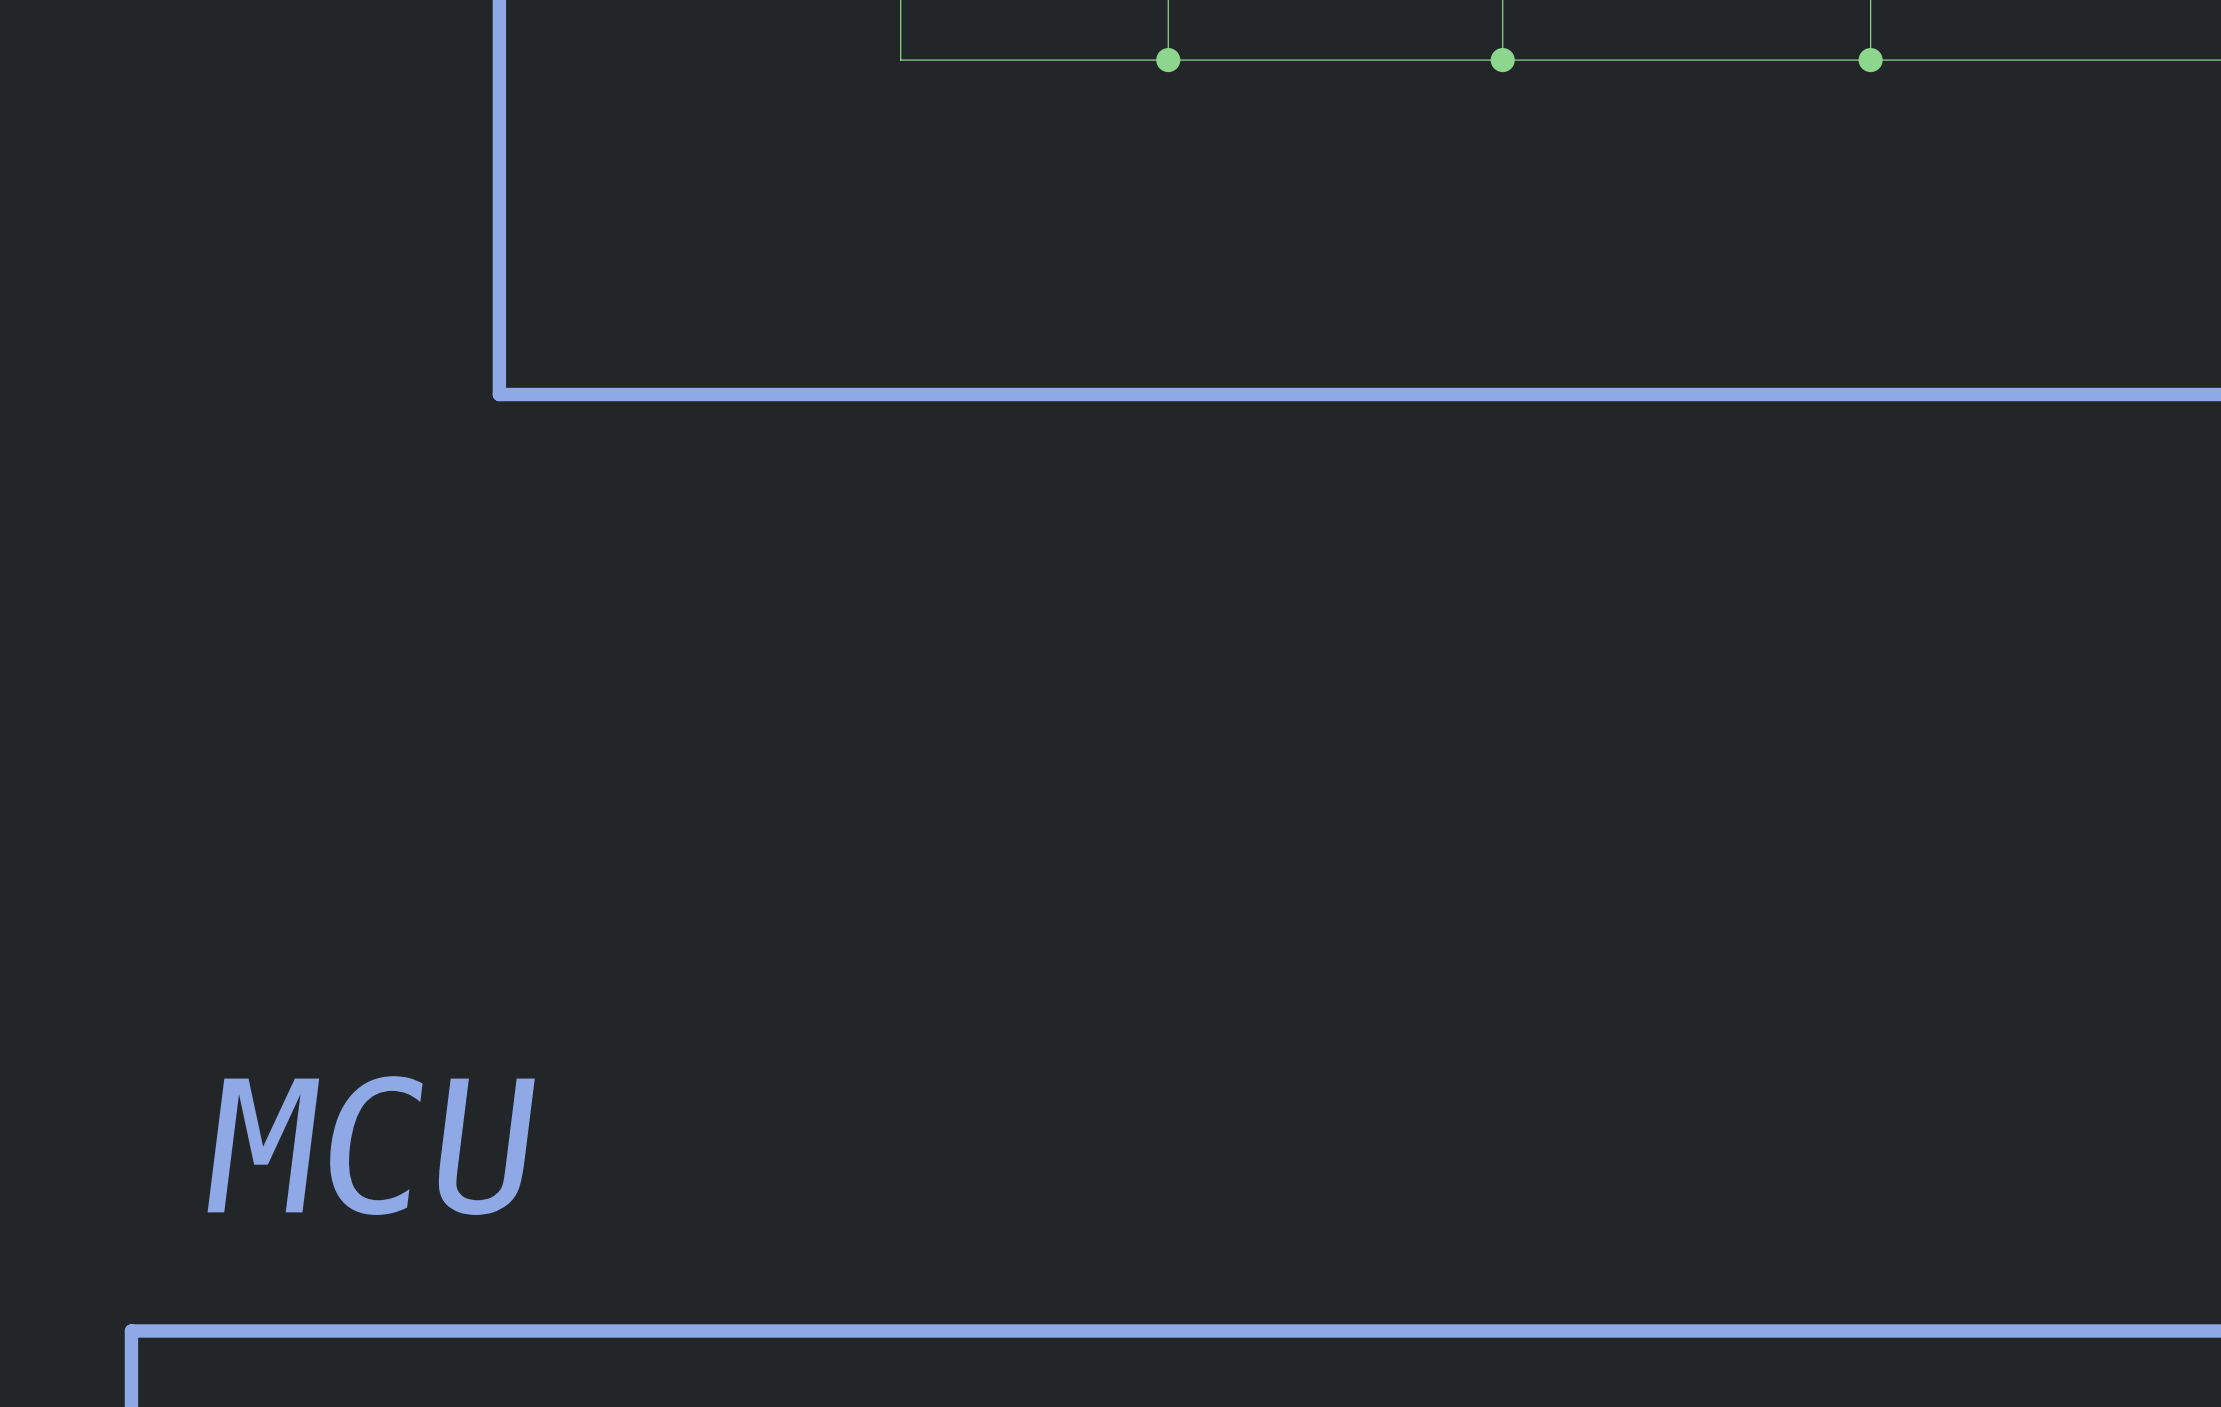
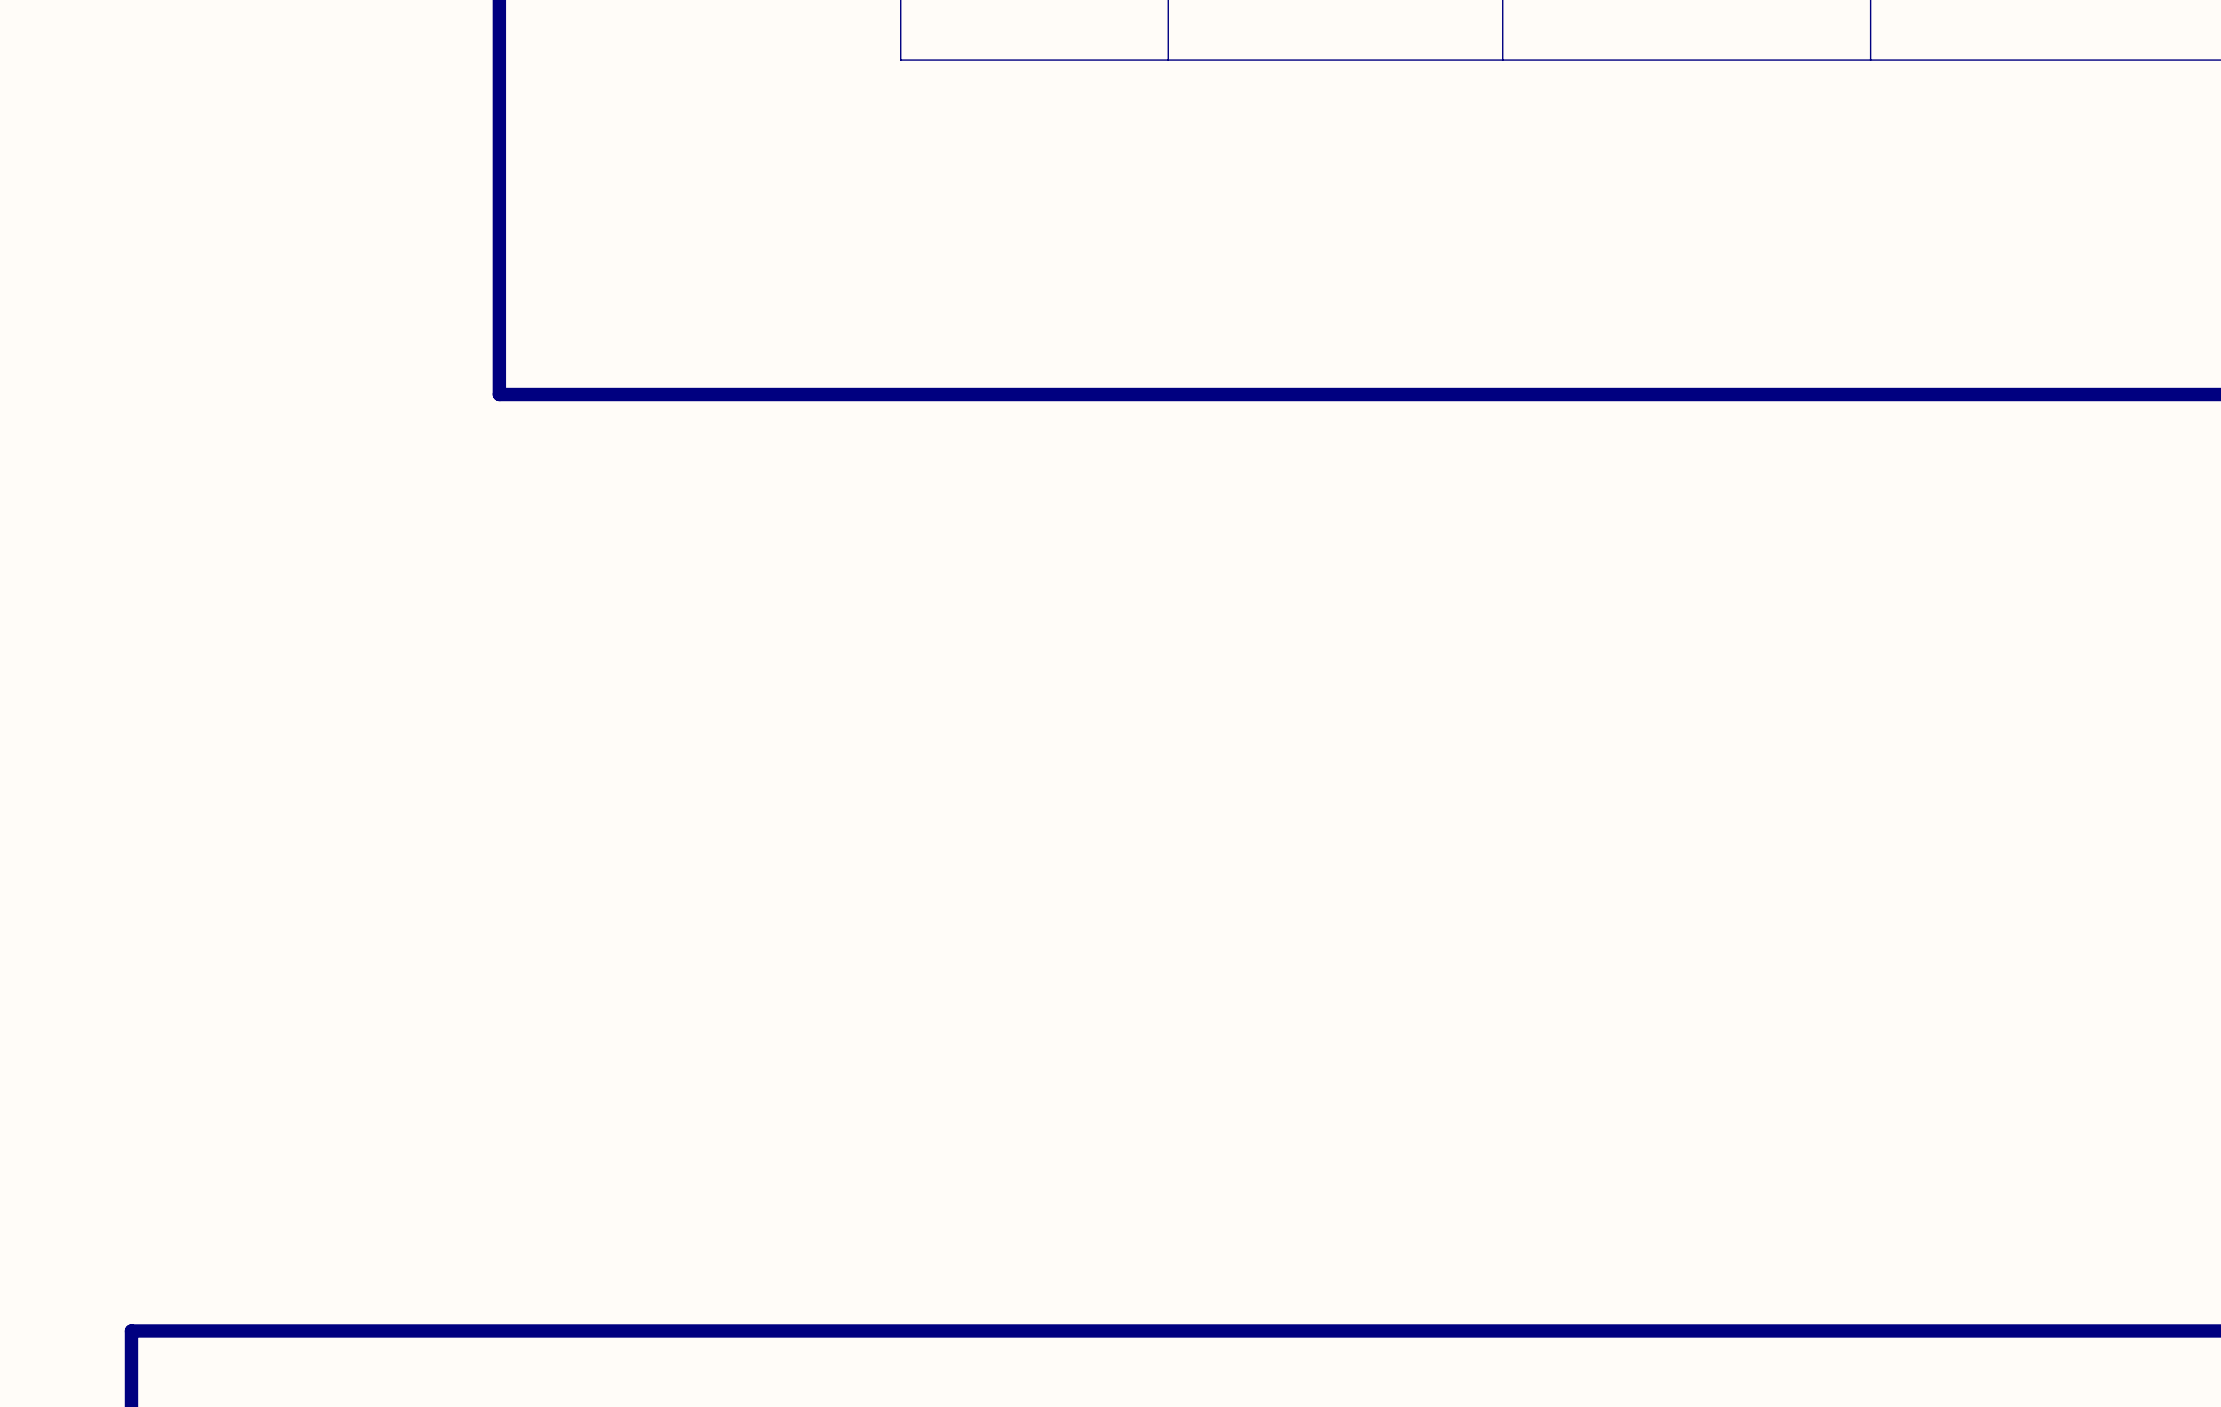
junction: (1168, 60) -> none
junction: (1502, 60) -> none
junction: (1870, 60) -> none
text: MCU (371, 1145) -> none

